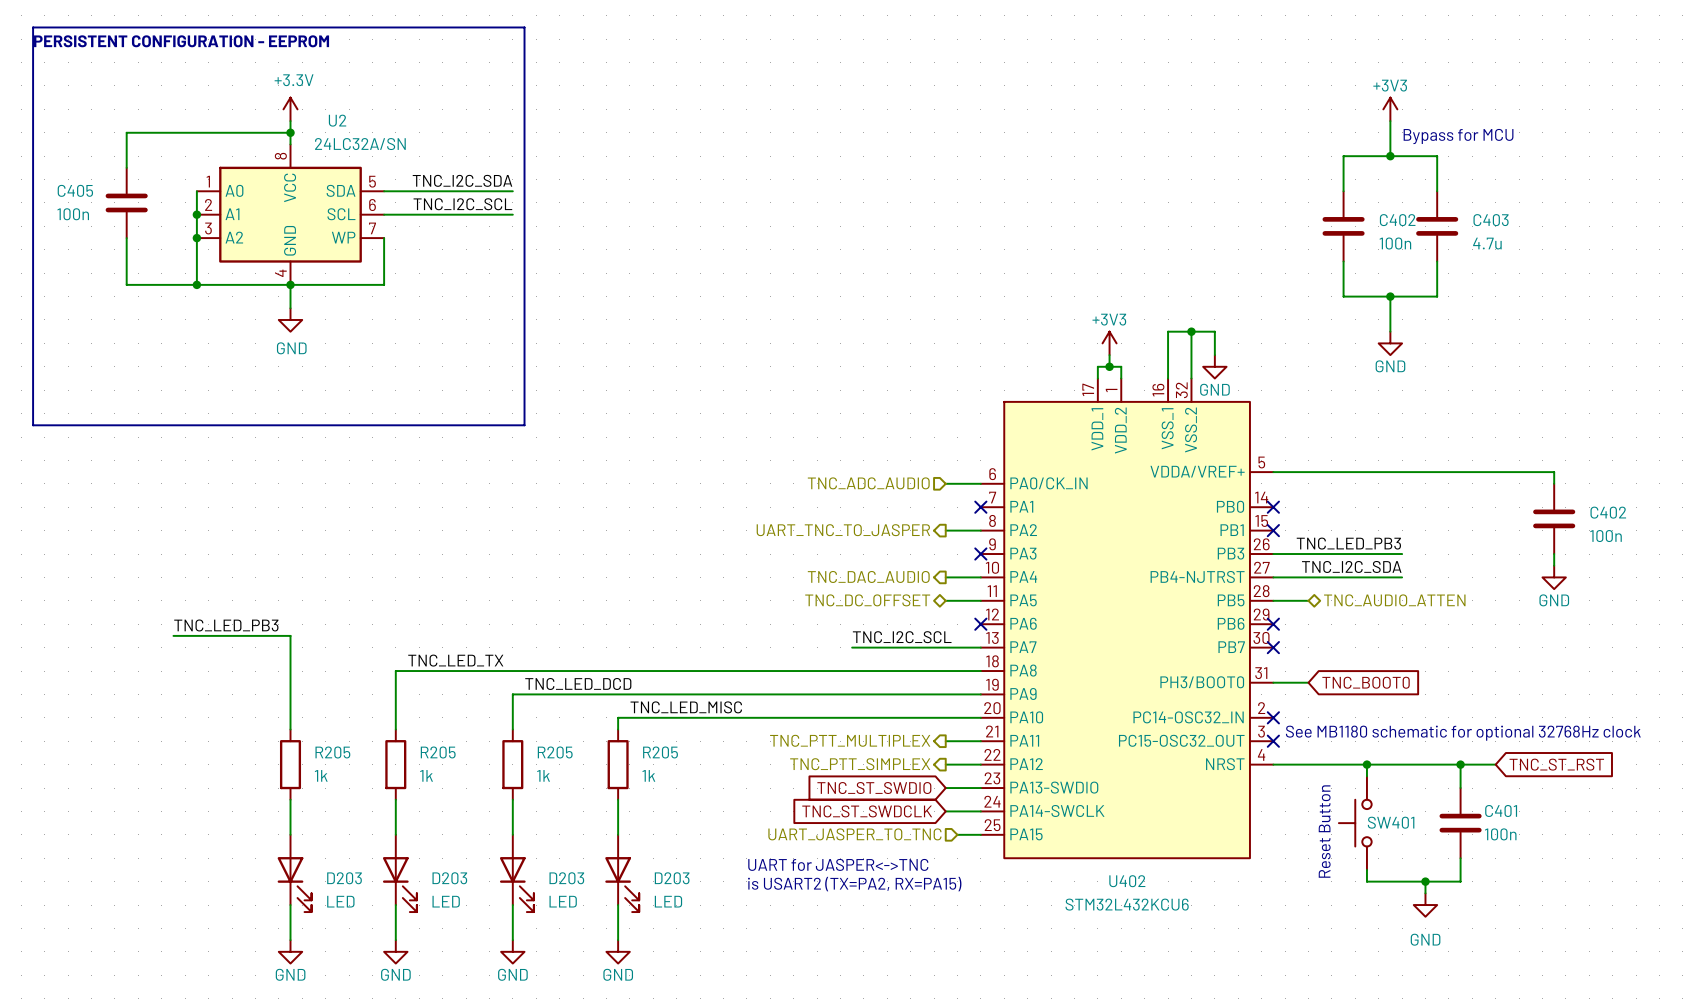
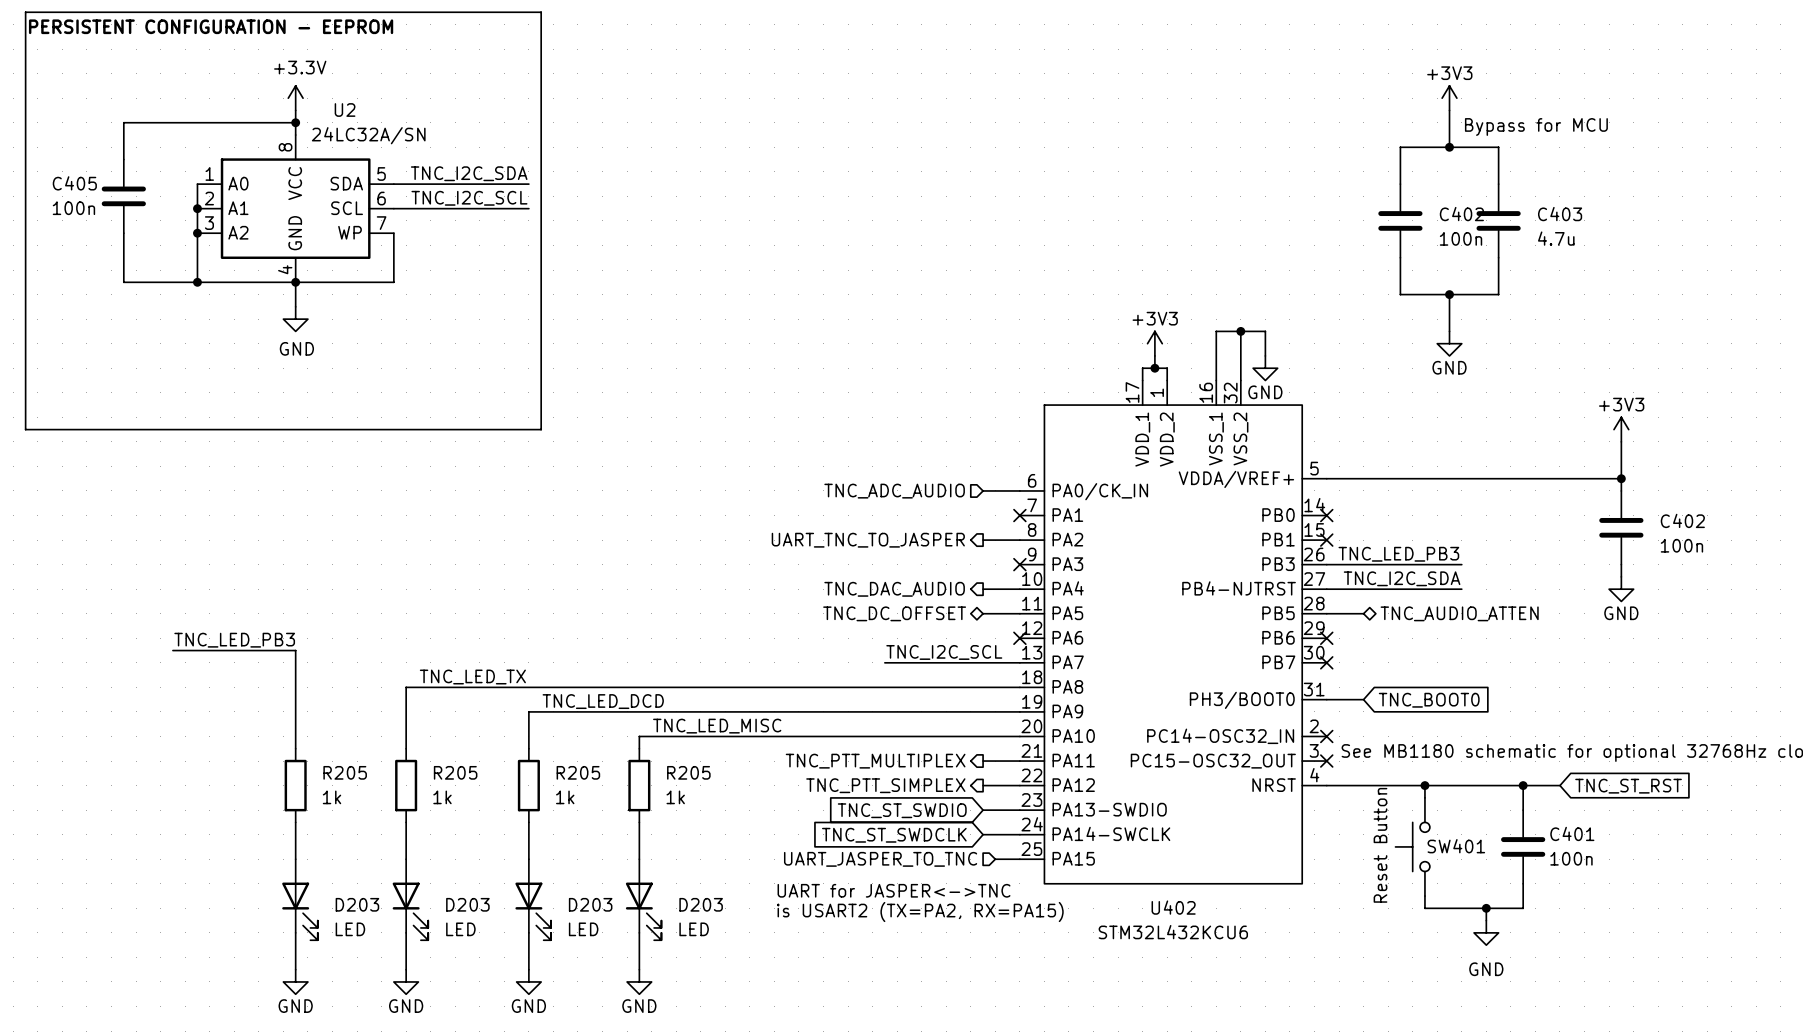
power symbol: none -> +3V3 (1621, 429)
wire: none -> (1621, 441) (1621, 478)
junction: none -> (1621, 478)

